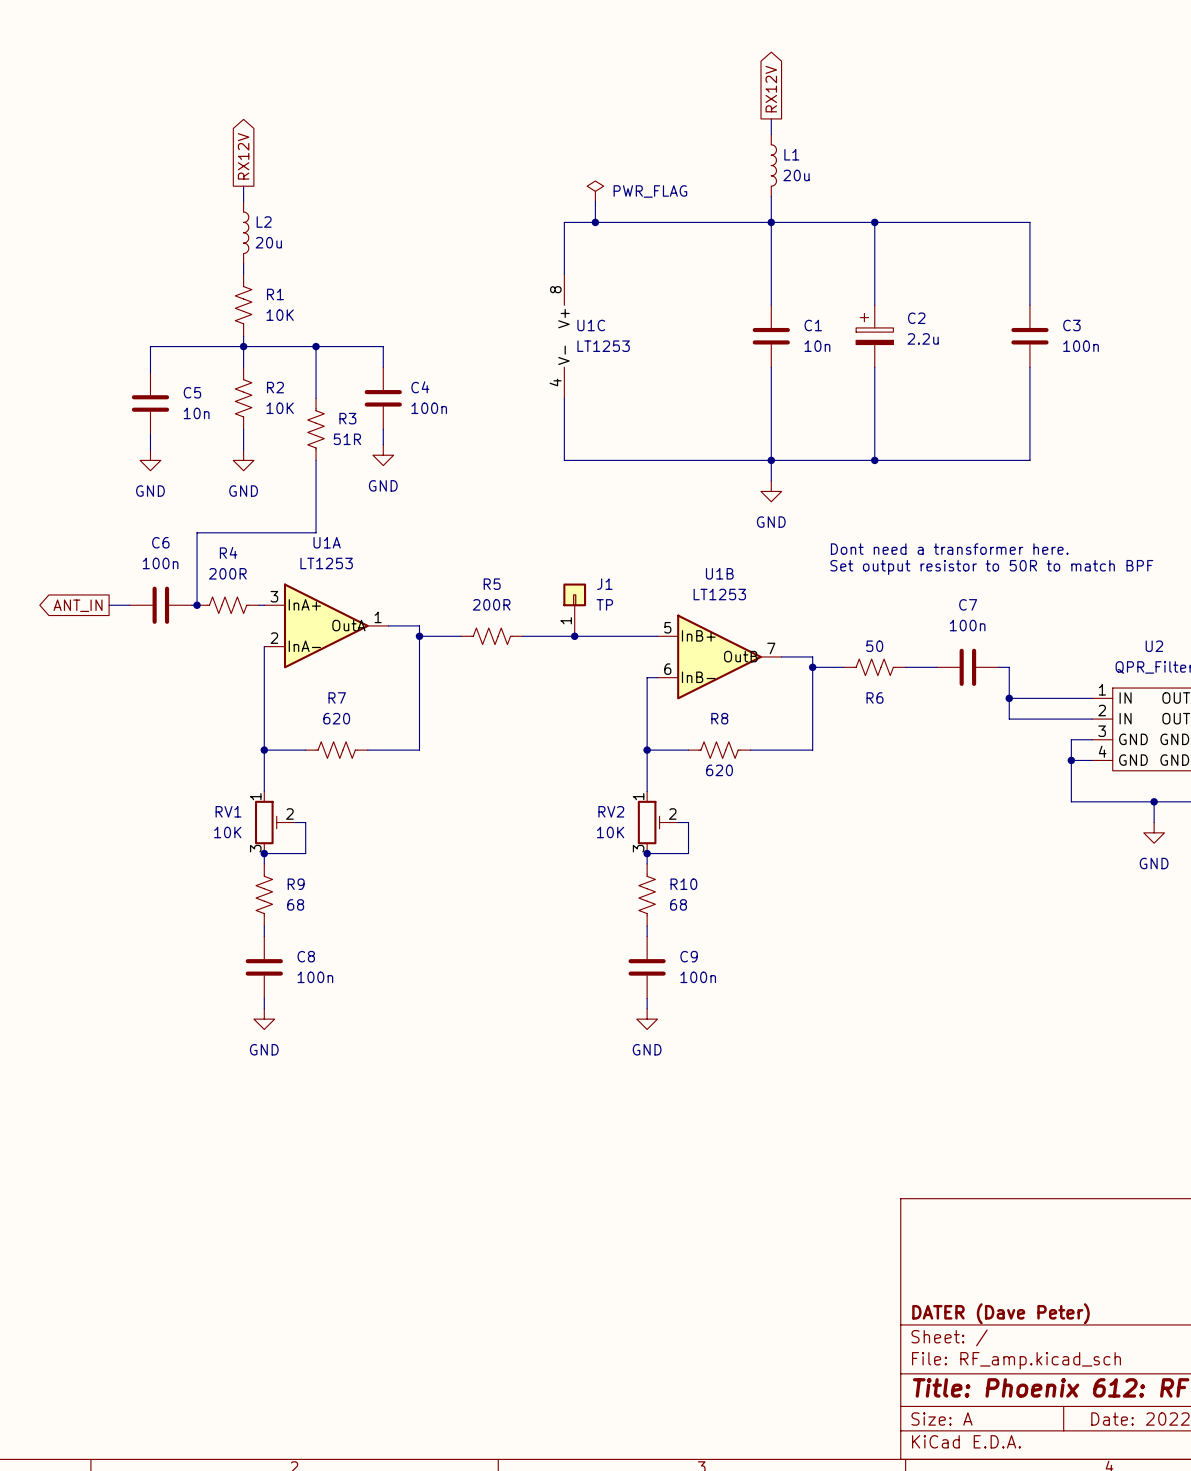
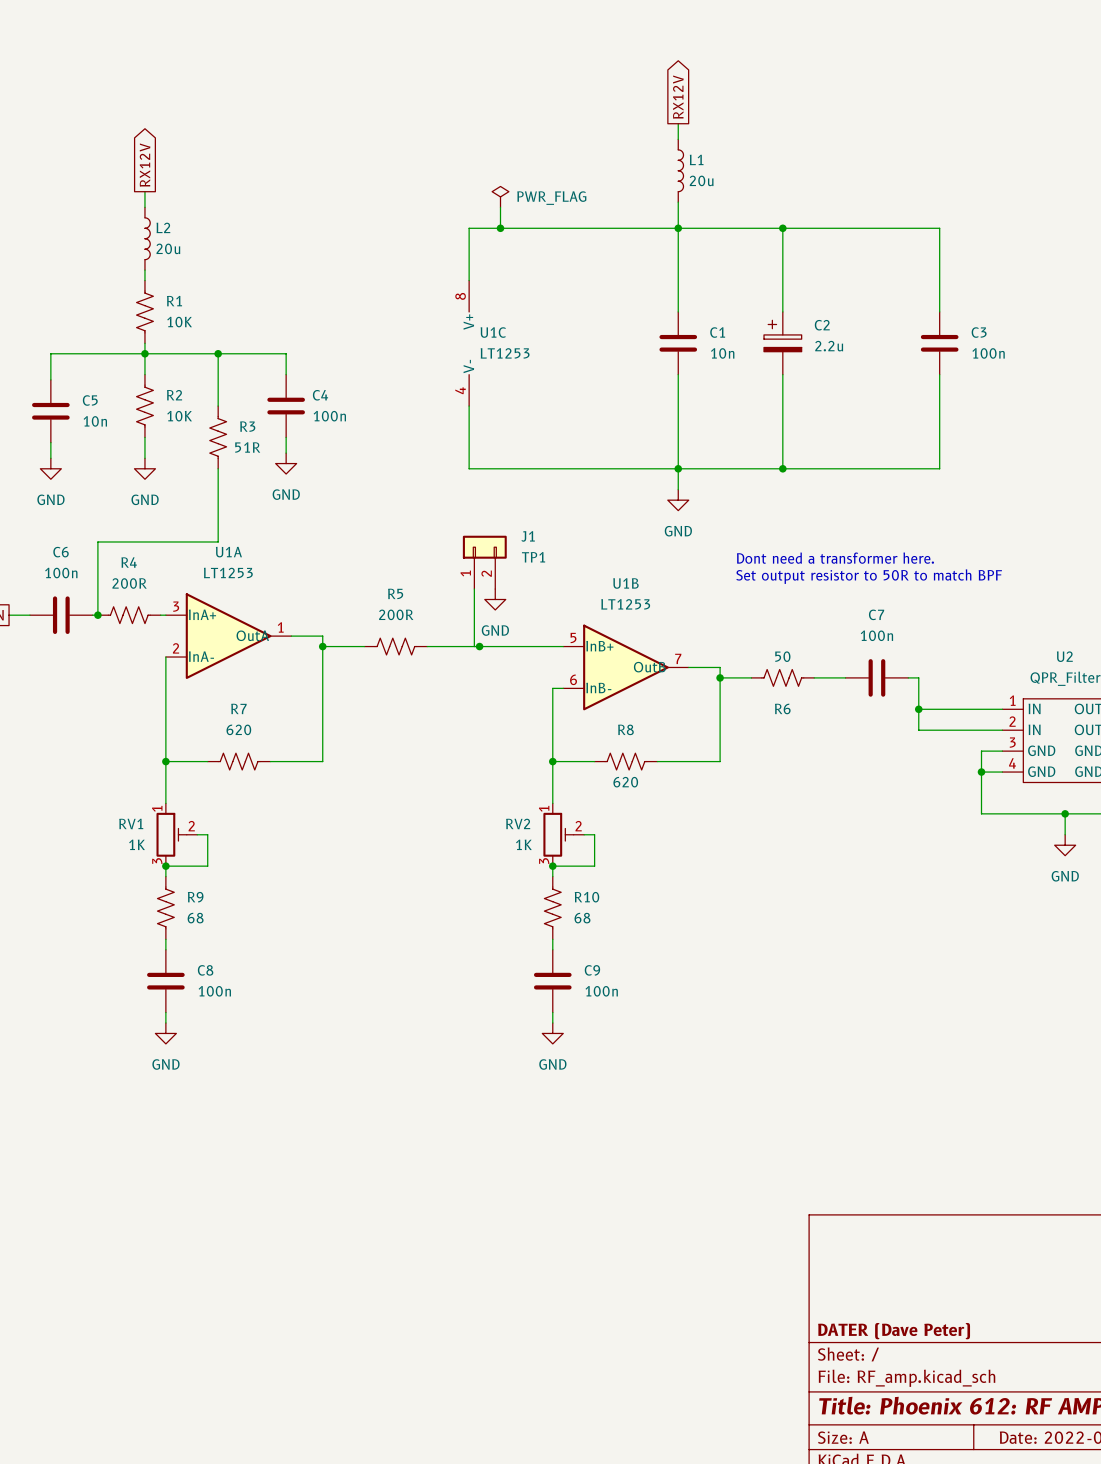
wire: none -> (474, 589) (474, 646)
J1 symbol: [563, 583, 587, 637] -> [462, 535, 507, 590]
power symbol: none -> GND (495, 599)
J1 value: TP (604, 604) -> TP1 (533, 557)
RV1 value: 10K (227, 832) -> 1K (137, 844)
RV2 value: 10K (610, 832) -> 1K (523, 844)

